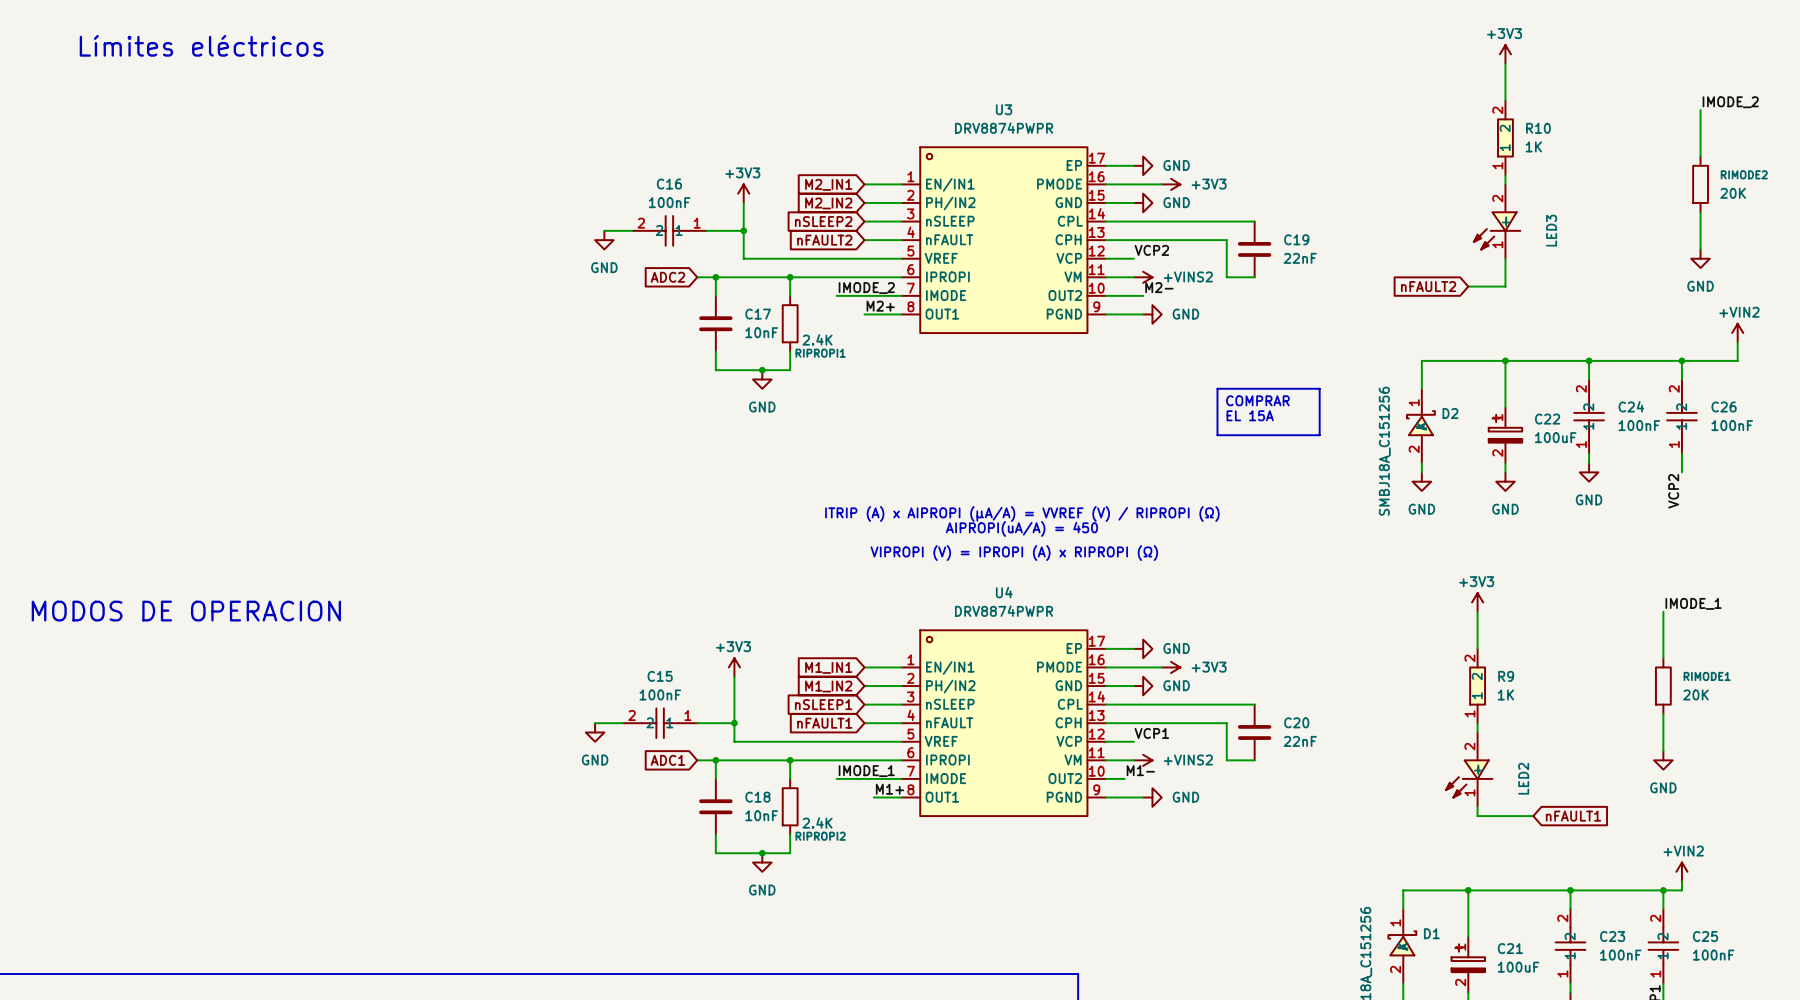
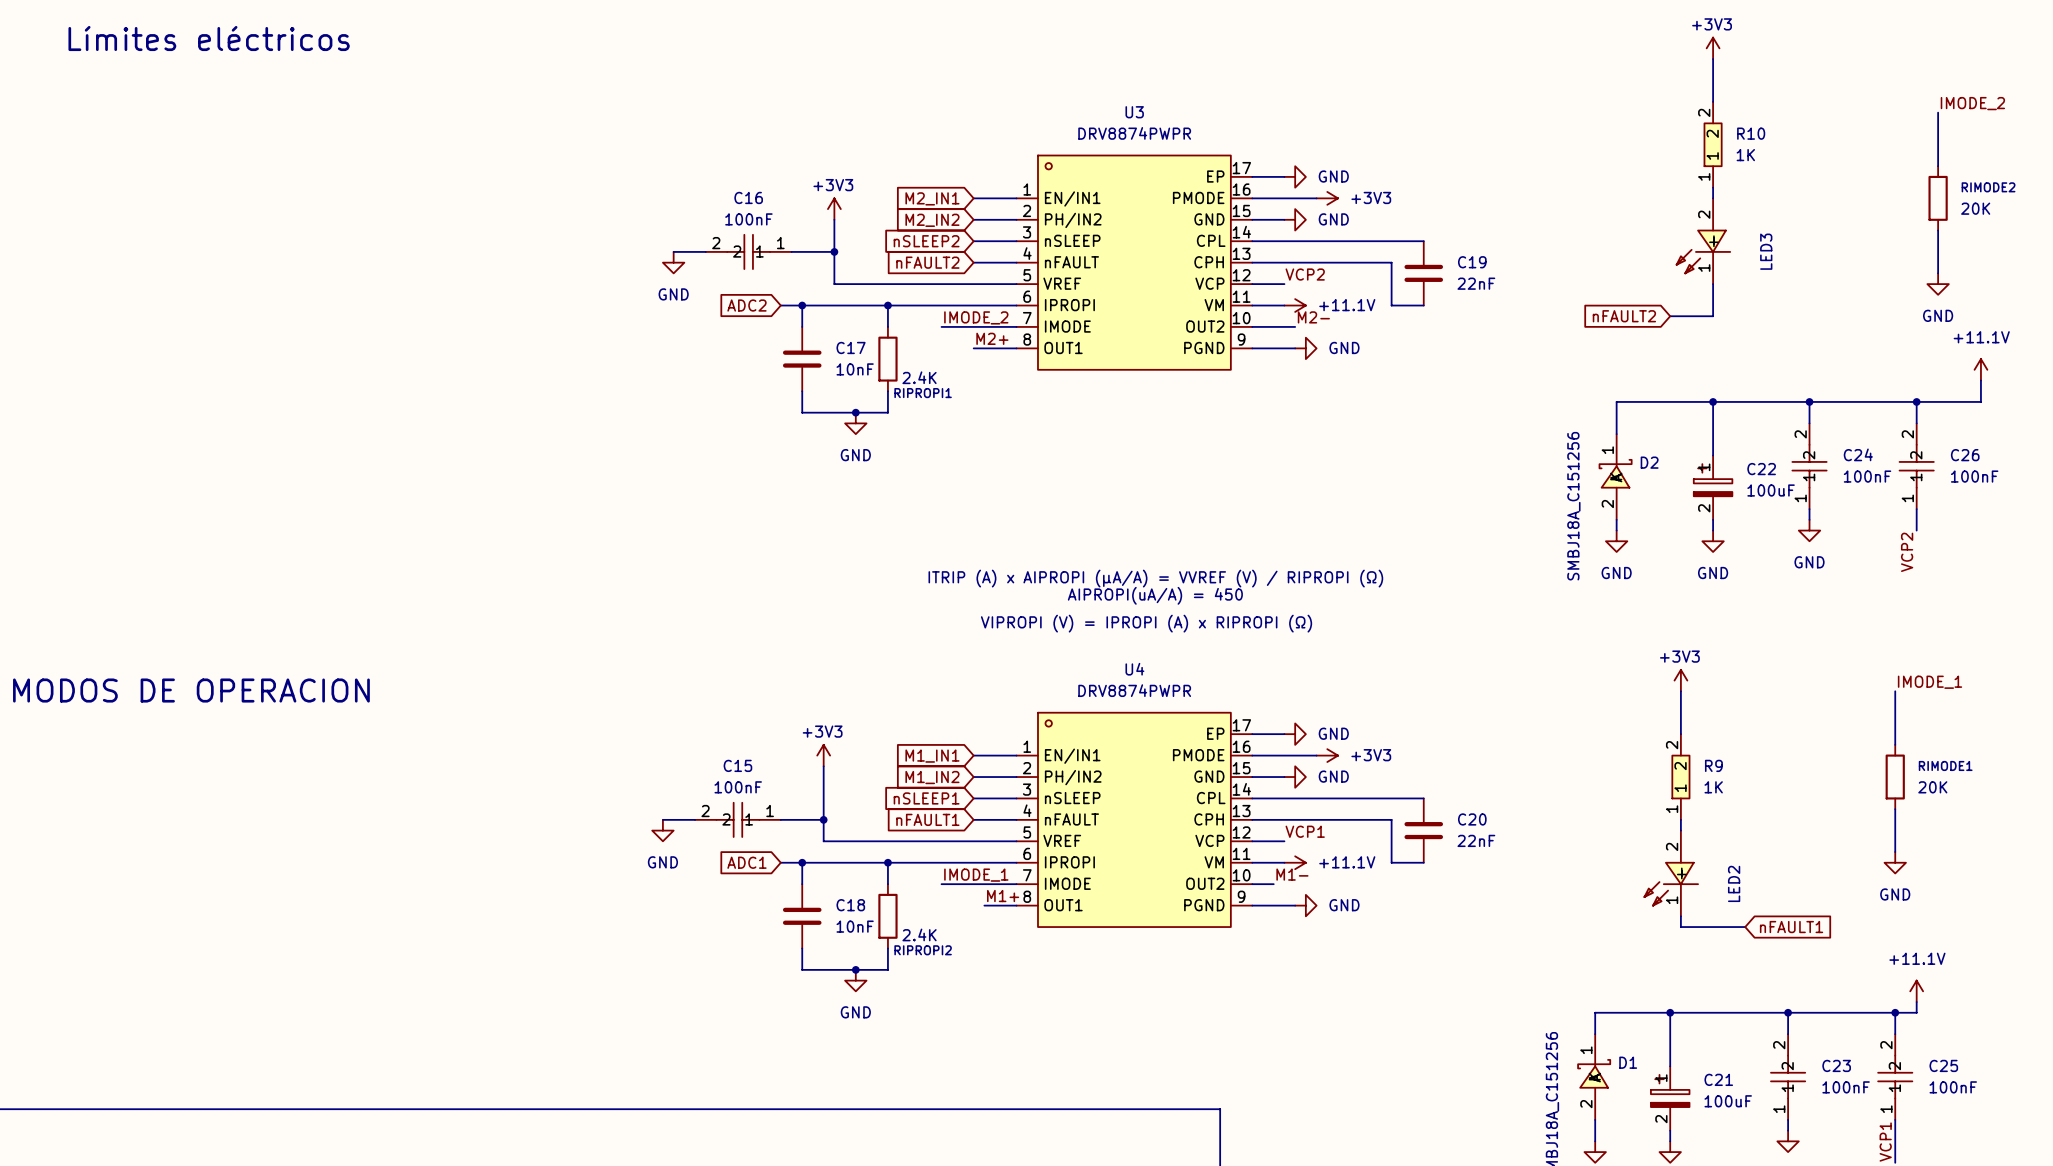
power symbol: +VINS2 (1143, 277) -> +11.1V (1295, 305)
power symbol: +VIN2 (1737, 333) -> +11.1V (1980, 369)
line: (1217, 388) (1319, 388) (1319, 435) (1217, 435) (1217, 388) -> none
text: COMPRAR (1257, 400) -> none
text: EL 15A (1250, 415) -> none
power symbol: +VINS2 (1143, 760) -> +11.1V (1295, 862)
power symbol: +VIN2 (1681, 871) -> +11.1V (1916, 991)

